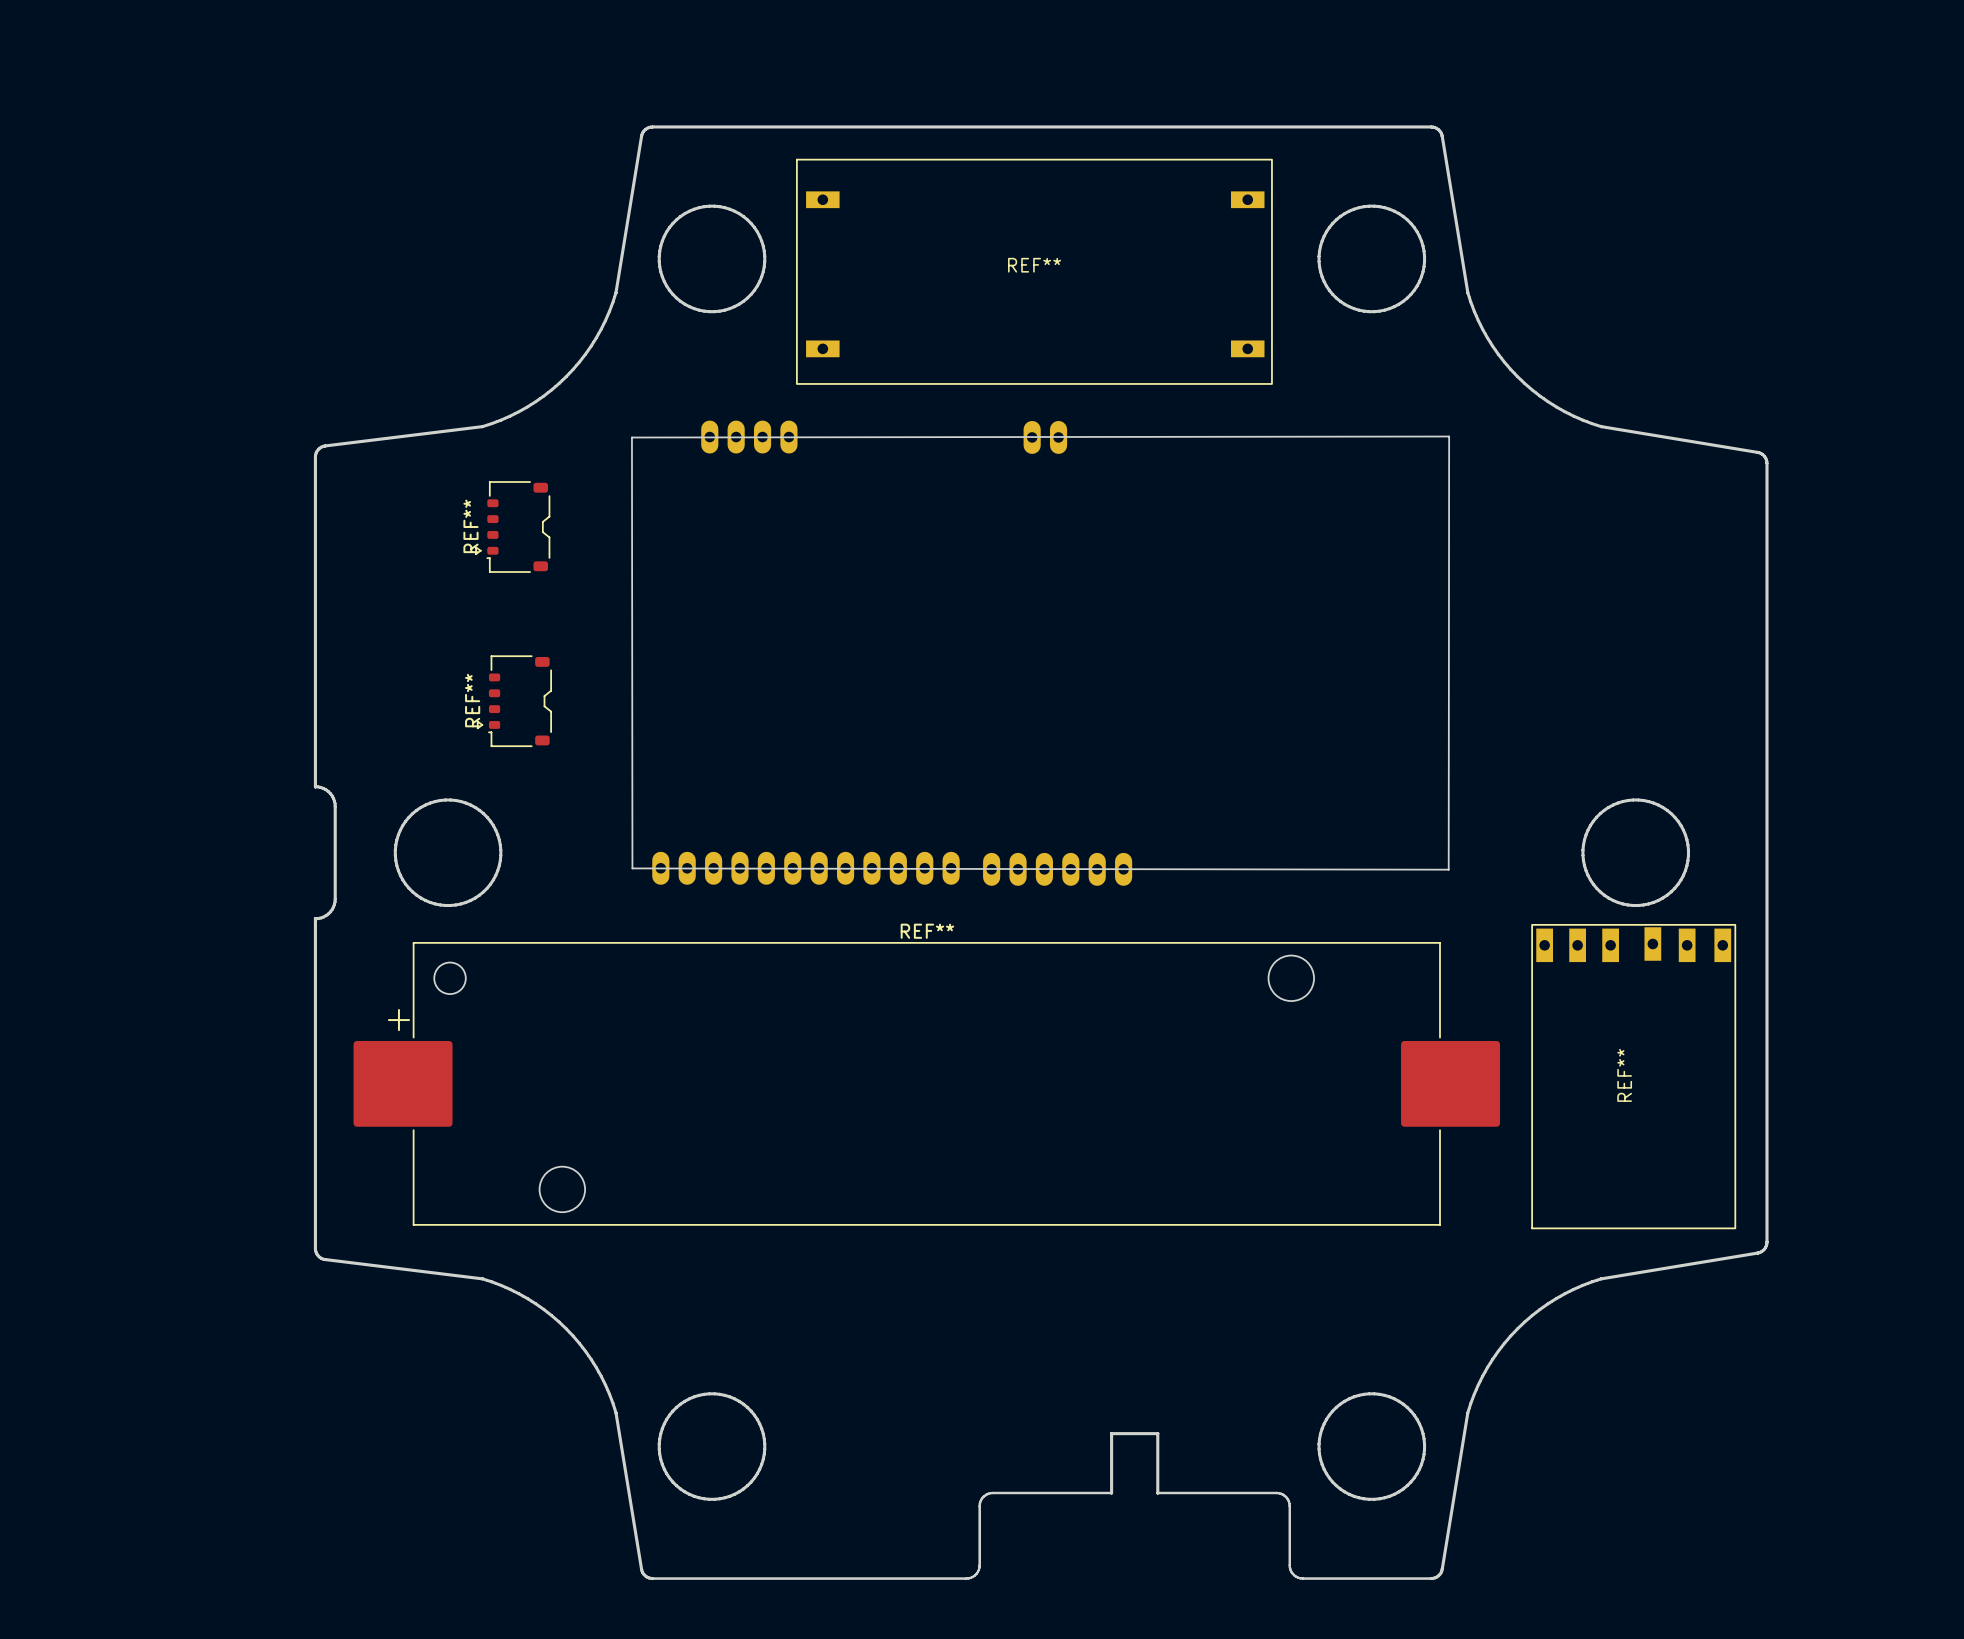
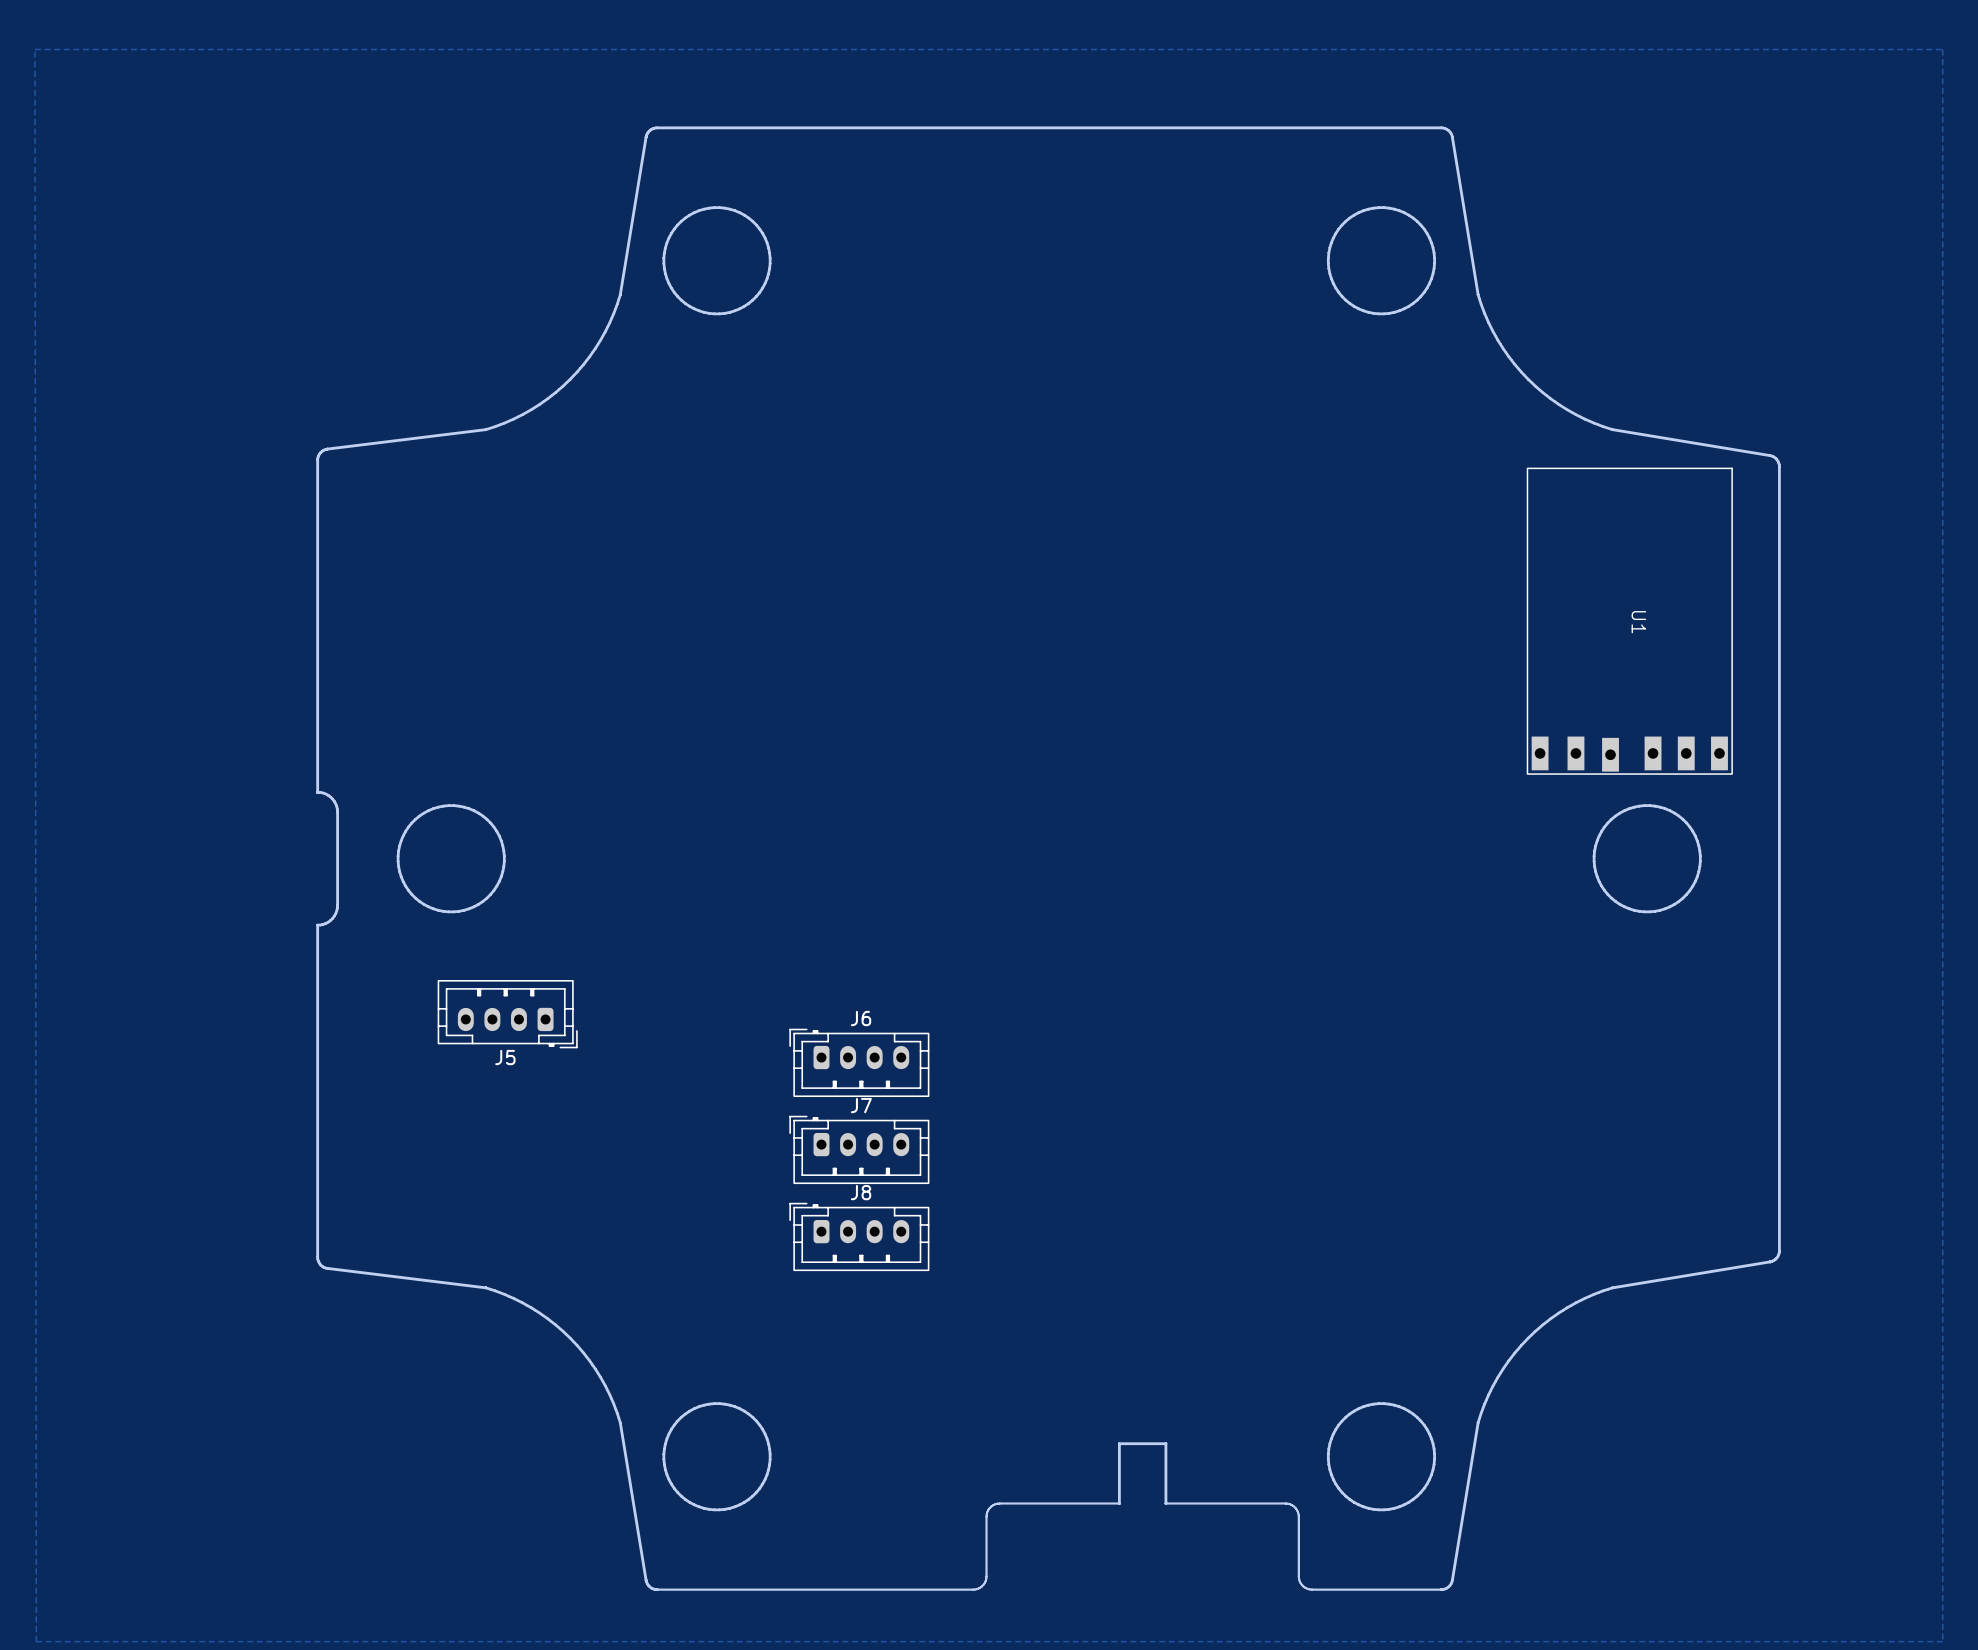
zone outline: none -> (34, 49) (1942, 49) (1942, 1641) (36, 1641) (34, 49)
REF**: (1034, 271) -> none
REF**: (512, 527) -> none
U1: none -> (1629, 621)
part: (1040, 653) -> none
REF**: (514, 701) -> none
J5: none -> (507, 1014)
J6: none -> (859, 1062)
REF**: (1633, 1076) -> none
REF**: (926, 1083) -> none
J7: none -> (859, 1149)
J8: none -> (859, 1236)

